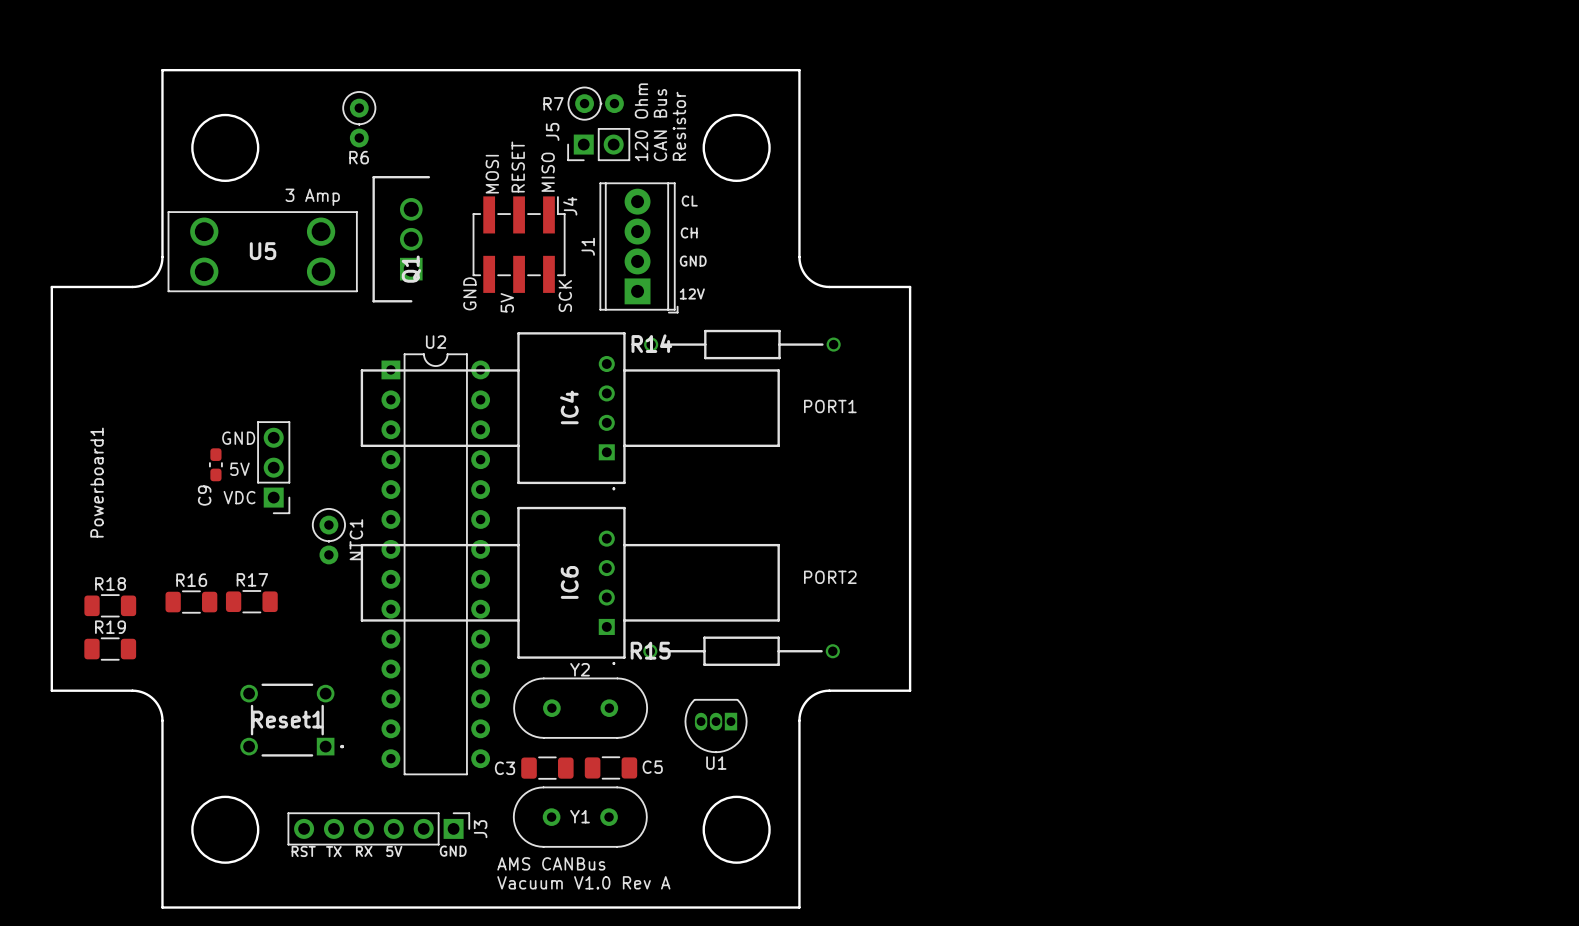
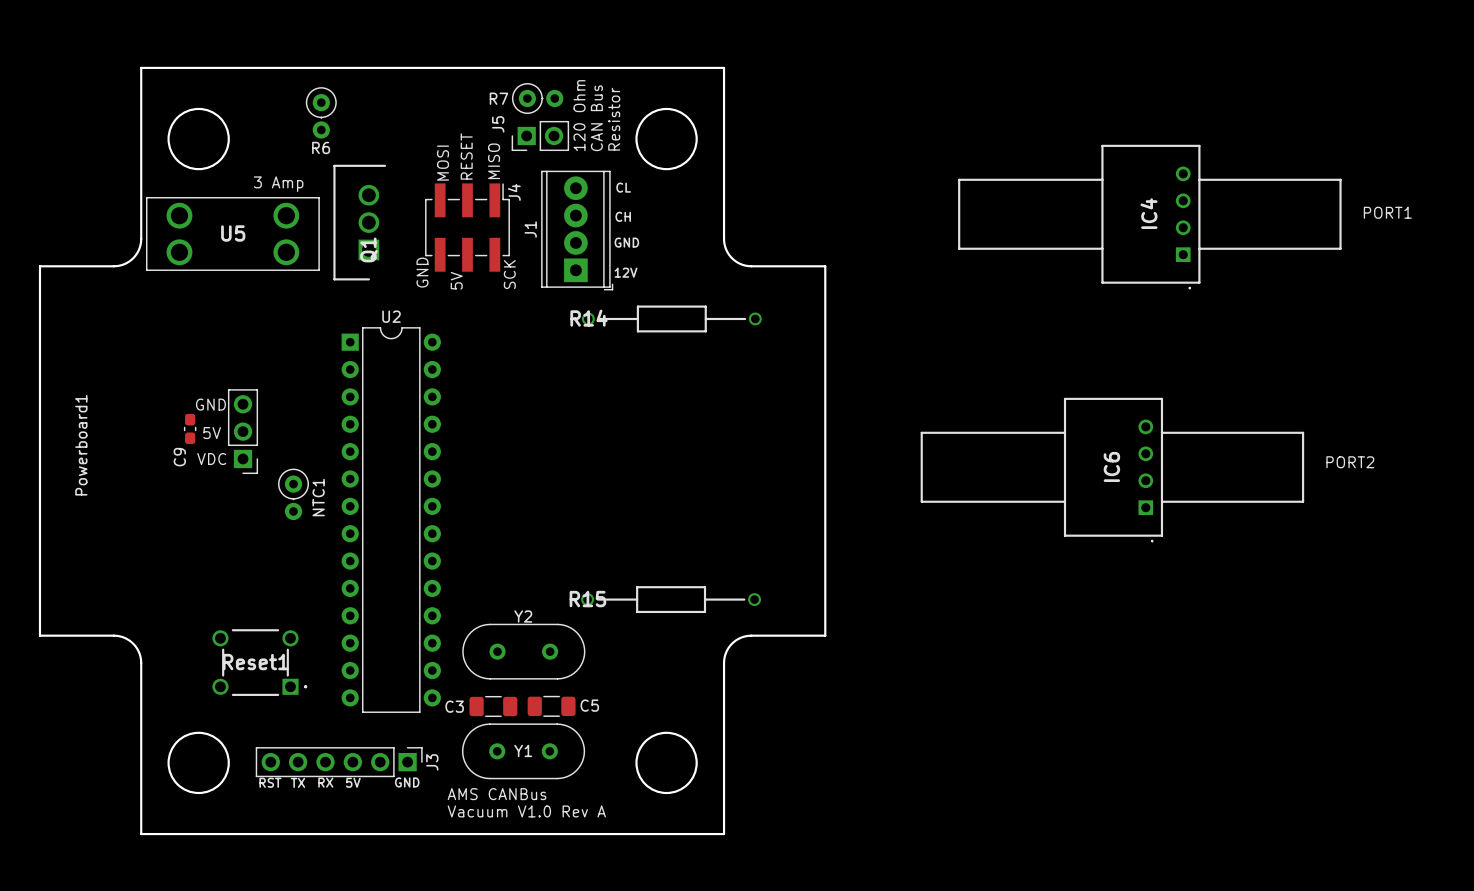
text: none -> PORT1 (1387, 212)
text: PORT1 (830, 406) -> none
IC4 position: (570, 411) -> (1149, 216)
text: none -> PORT2 (1350, 462)
text: PORT2 (830, 577) -> none
IC6 position: (570, 585) -> (1112, 469)
R17: (251, 601) -> none
R16: (191, 602) -> none
R18: (110, 605) -> none
R19: (110, 649) -> none
U1: (716, 726) -> none

